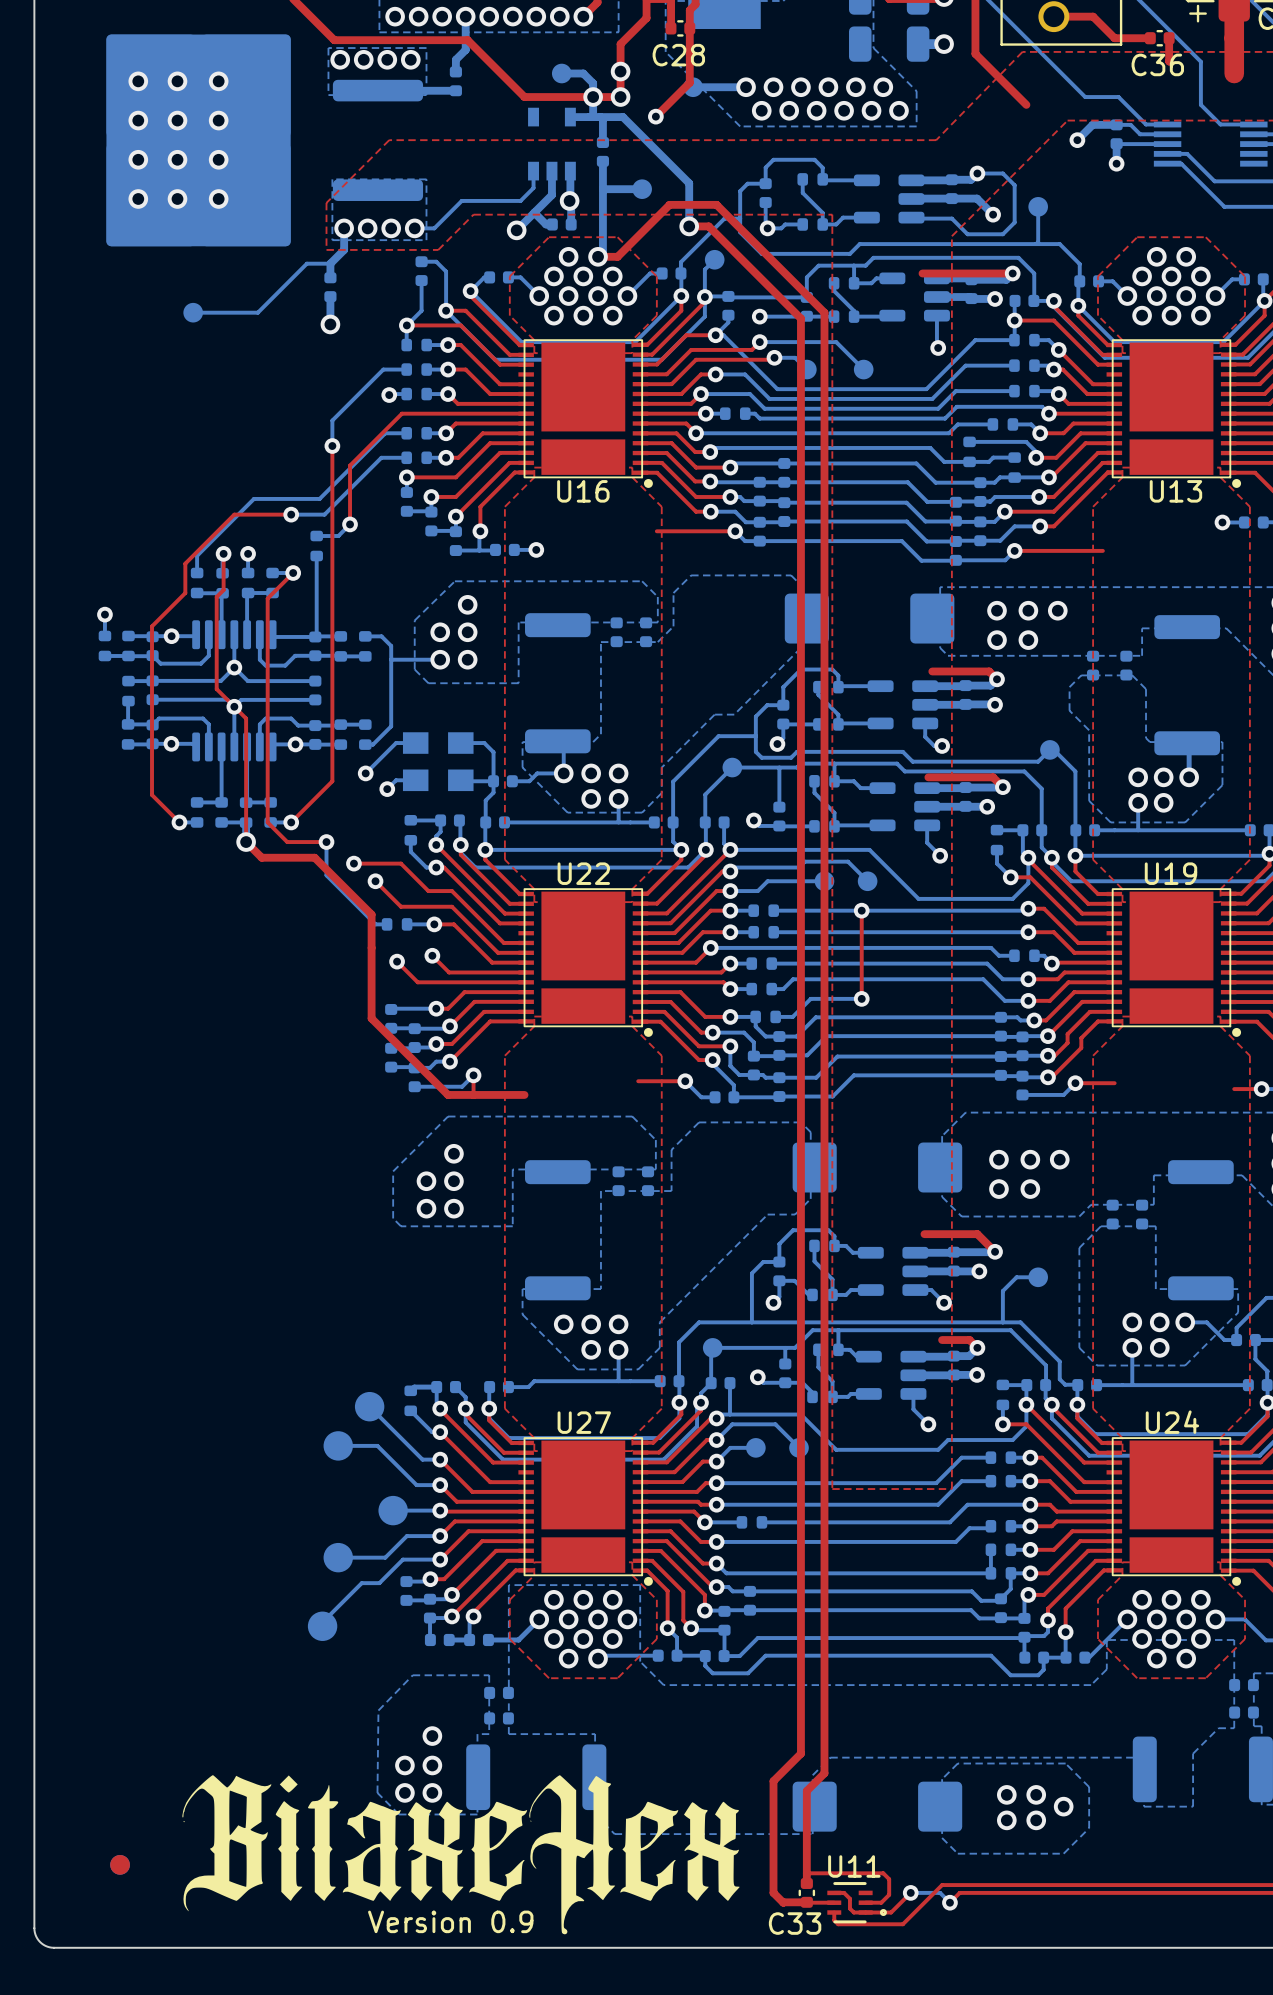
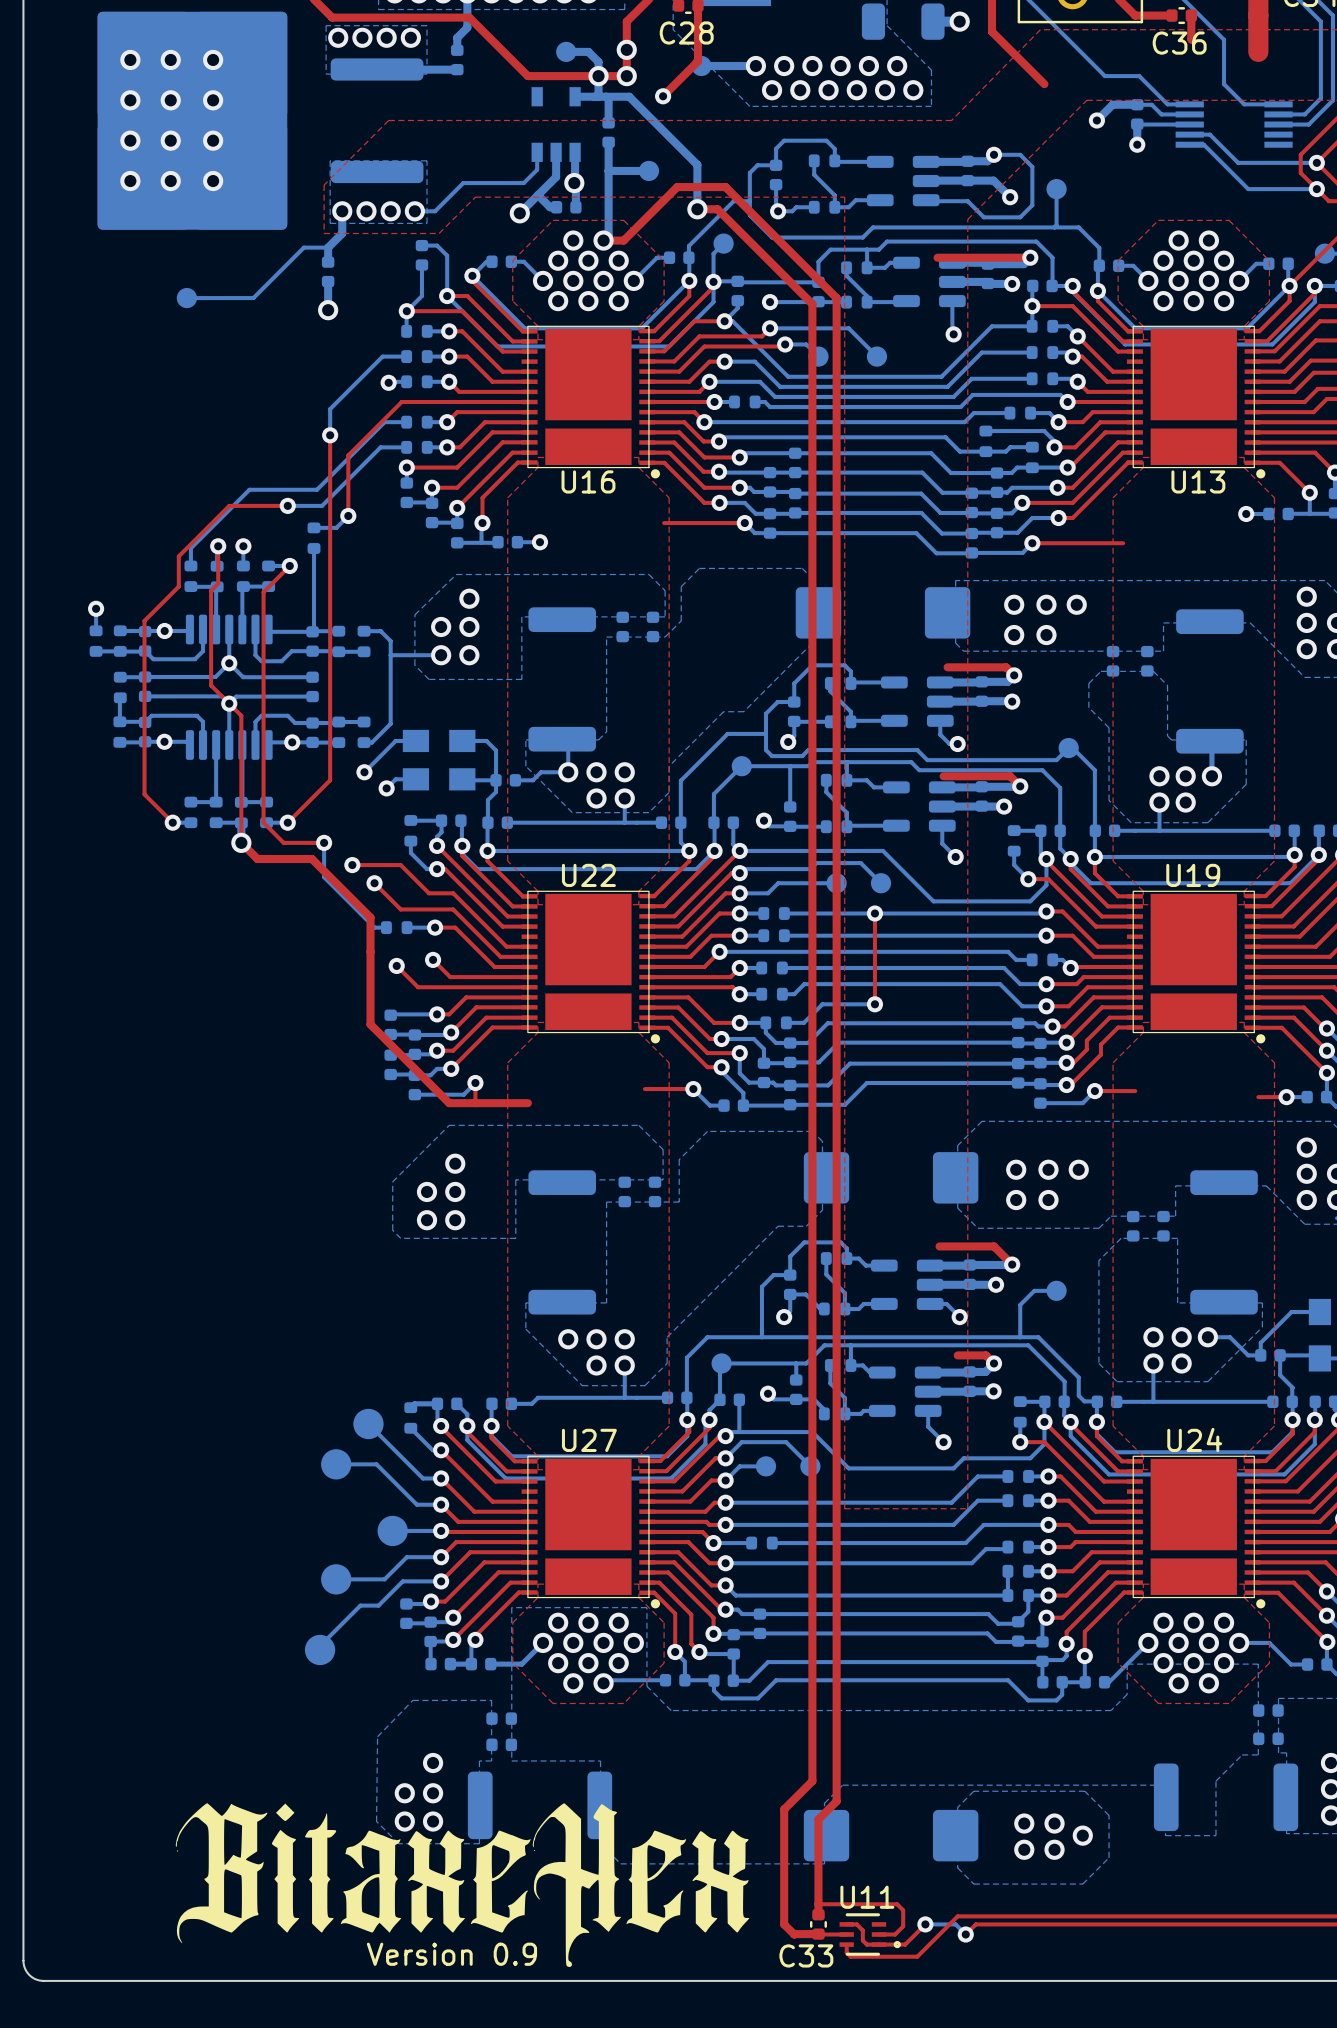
part: (120, 1864) -> none

